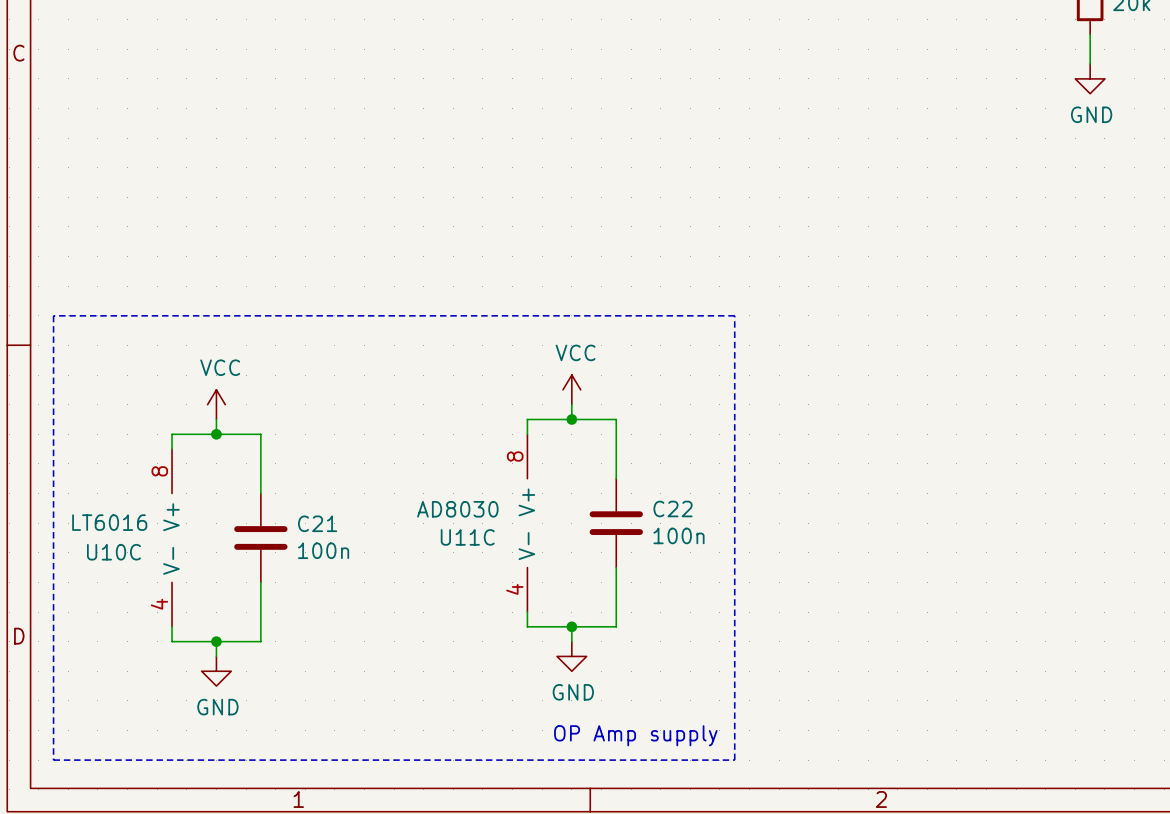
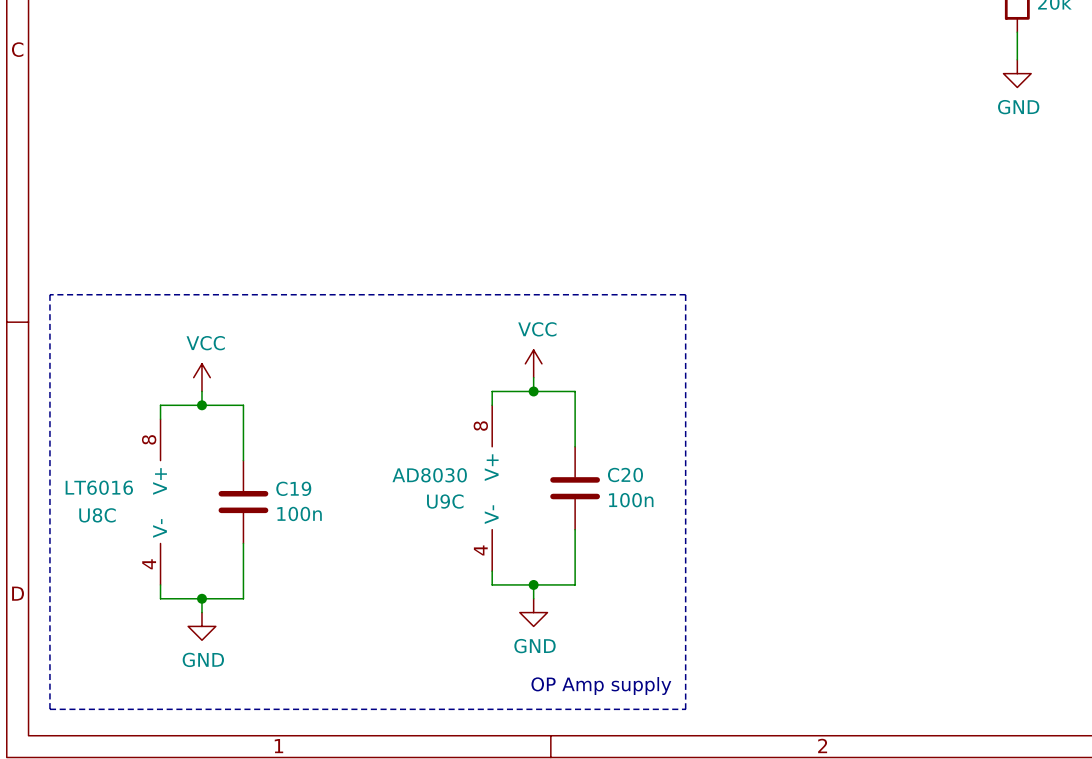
C22 name: C22 (673, 508) -> C20 (625, 475)
C21 name: C21 (317, 523) -> C19 (293, 488)
U11C name: U11C (467, 537) -> U9C (445, 501)
U10C name: U10C (113, 552) -> U8C (97, 515)

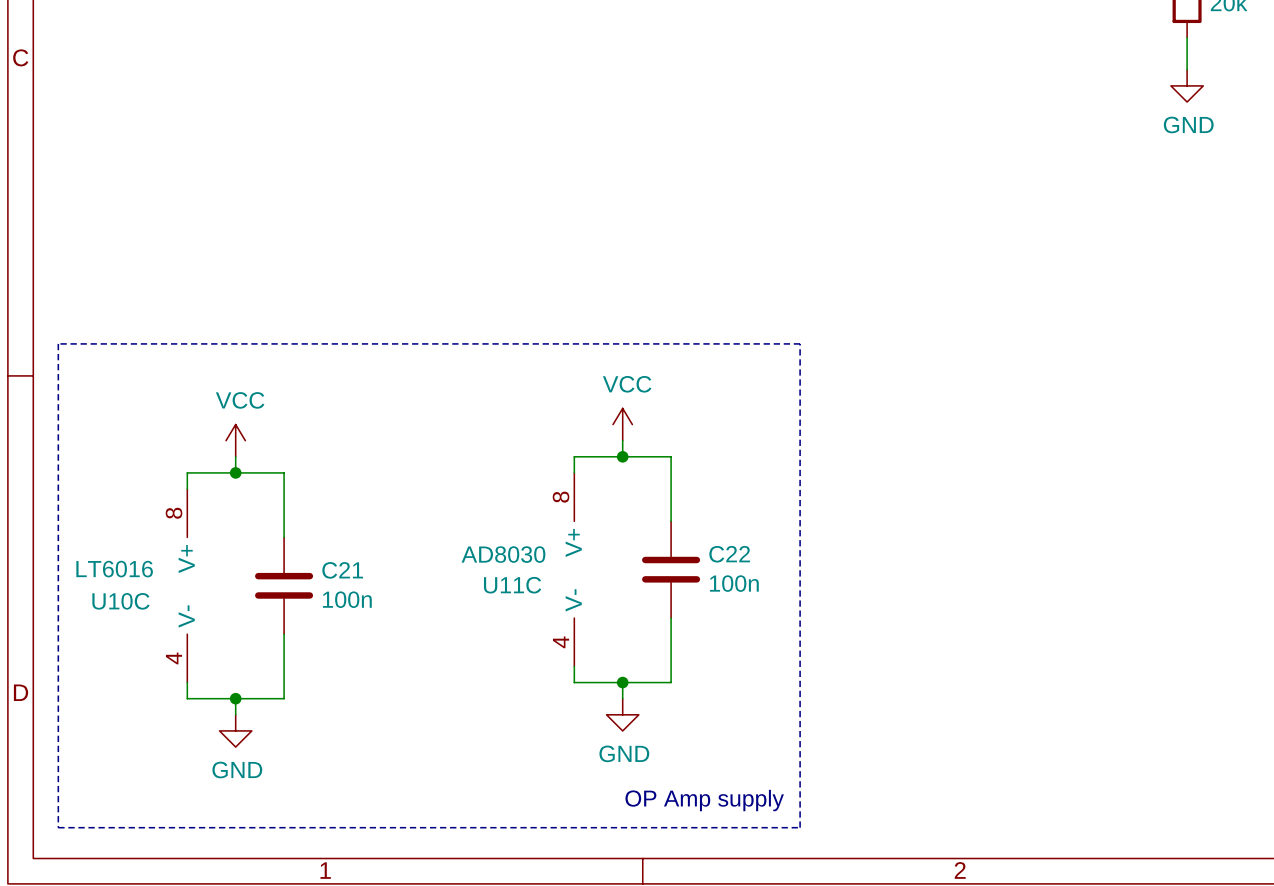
C20 name: C20 (625, 475) -> C22 (729, 554)
C19 name: C19 (293, 488) -> C21 (342, 570)
U9C name: U9C (445, 501) -> U11C (512, 585)
U8C name: U8C (97, 515) -> U10C (120, 601)

